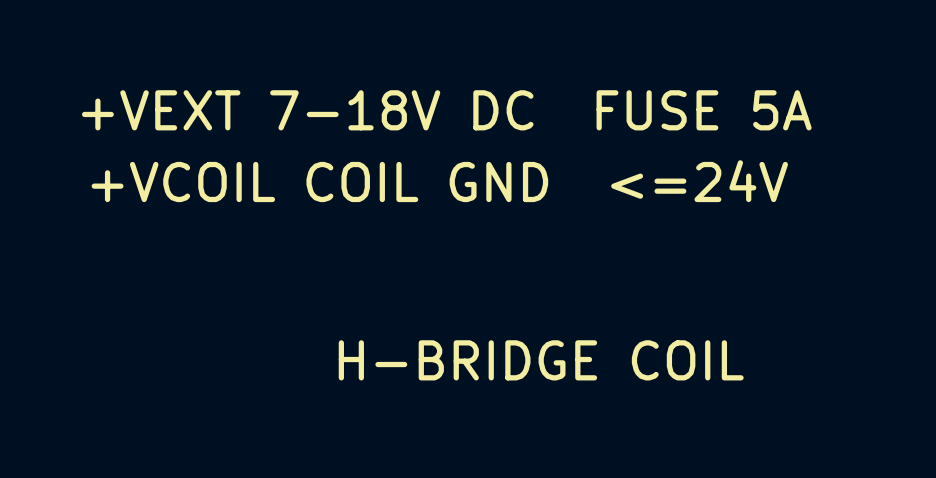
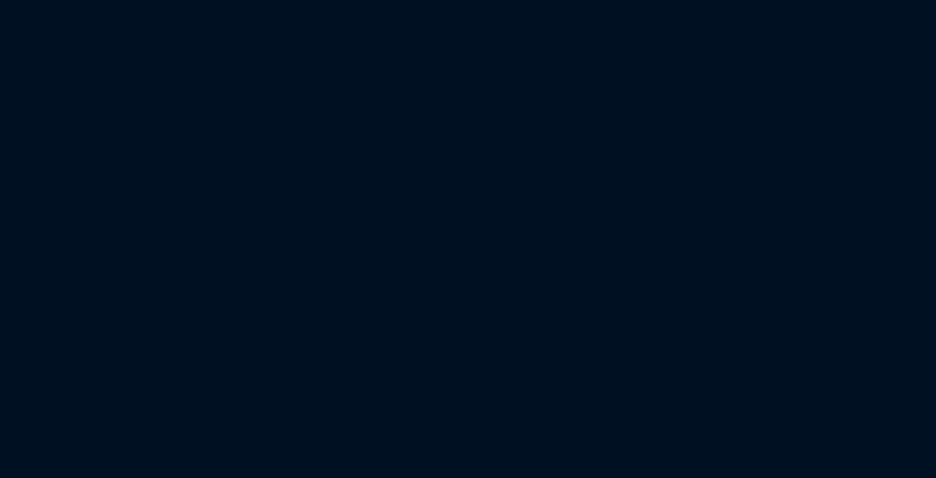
text: +VEXT 7-18V DC FUSE 5A (446, 110) -> none
text: +VCOIL COIL GND <=24V (439, 181) -> none
text: H-BRIDGE COIL (541, 360) -> none

